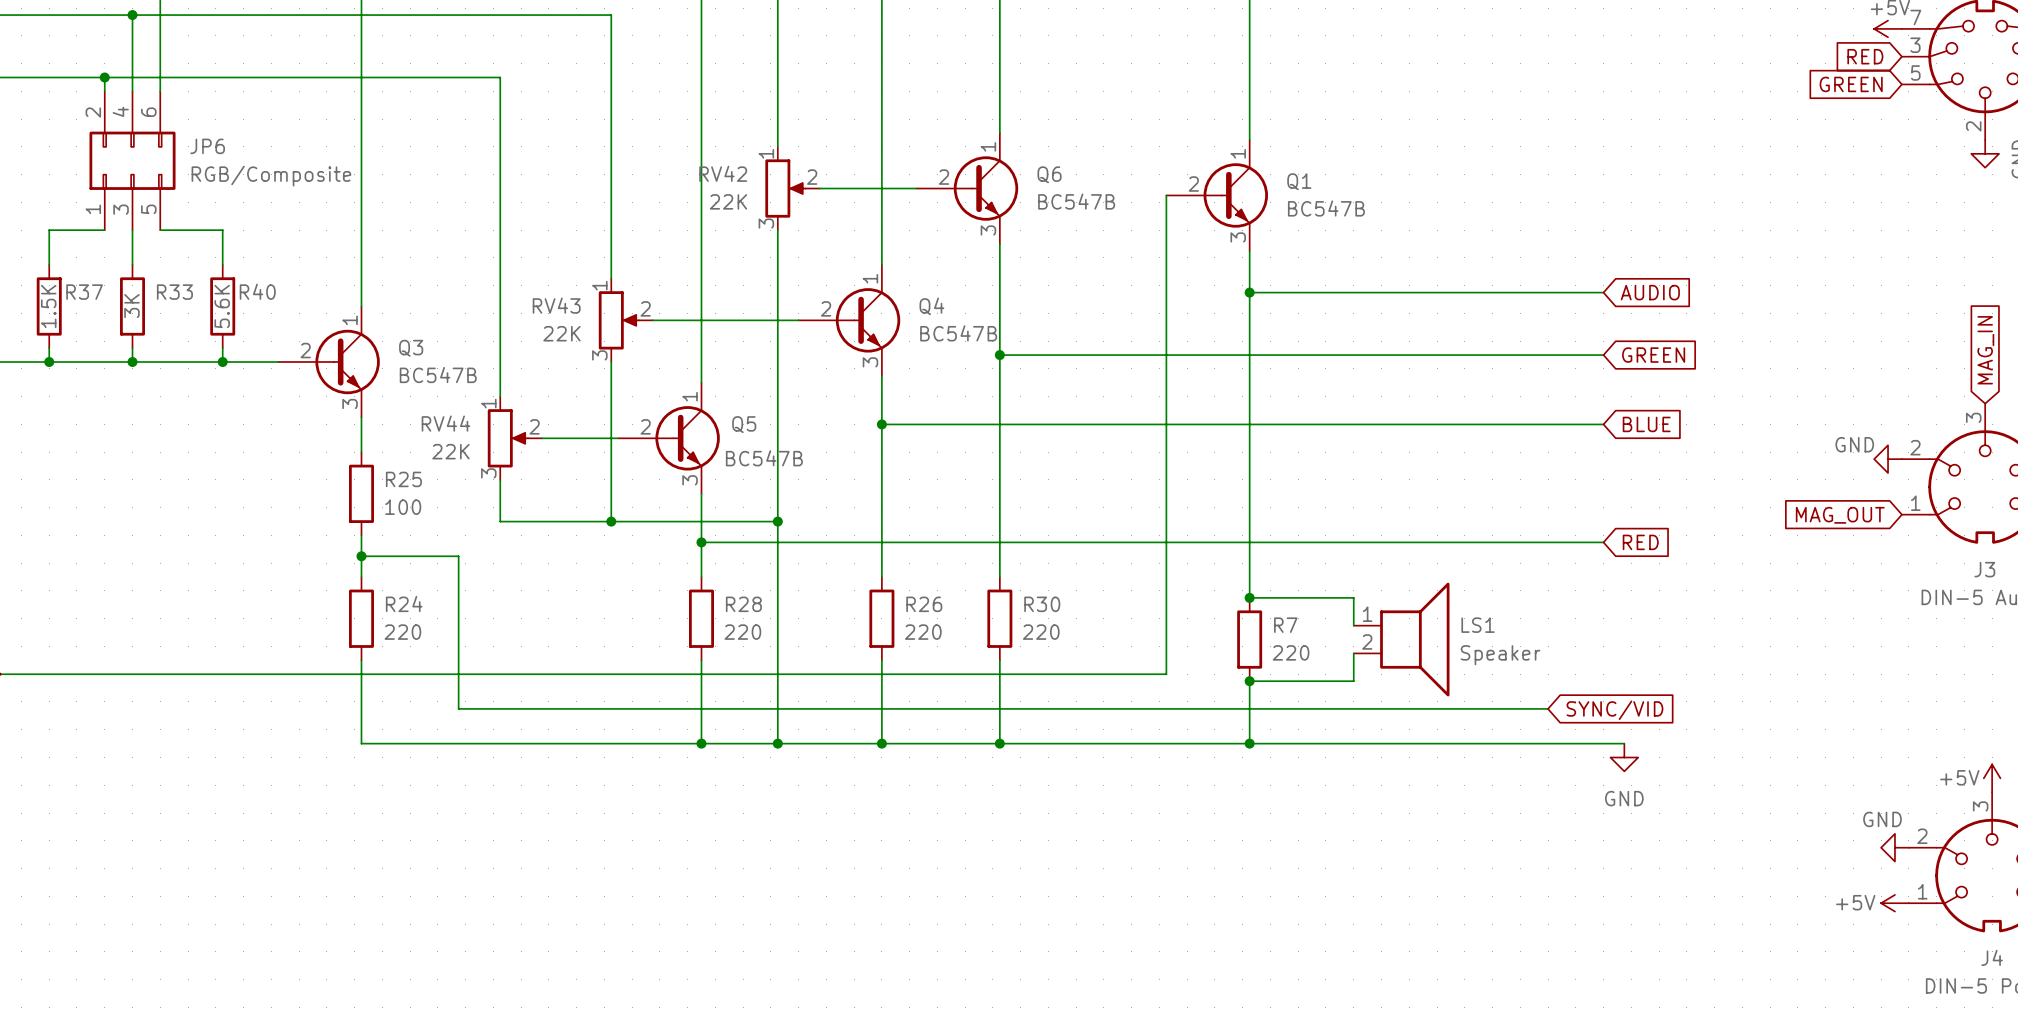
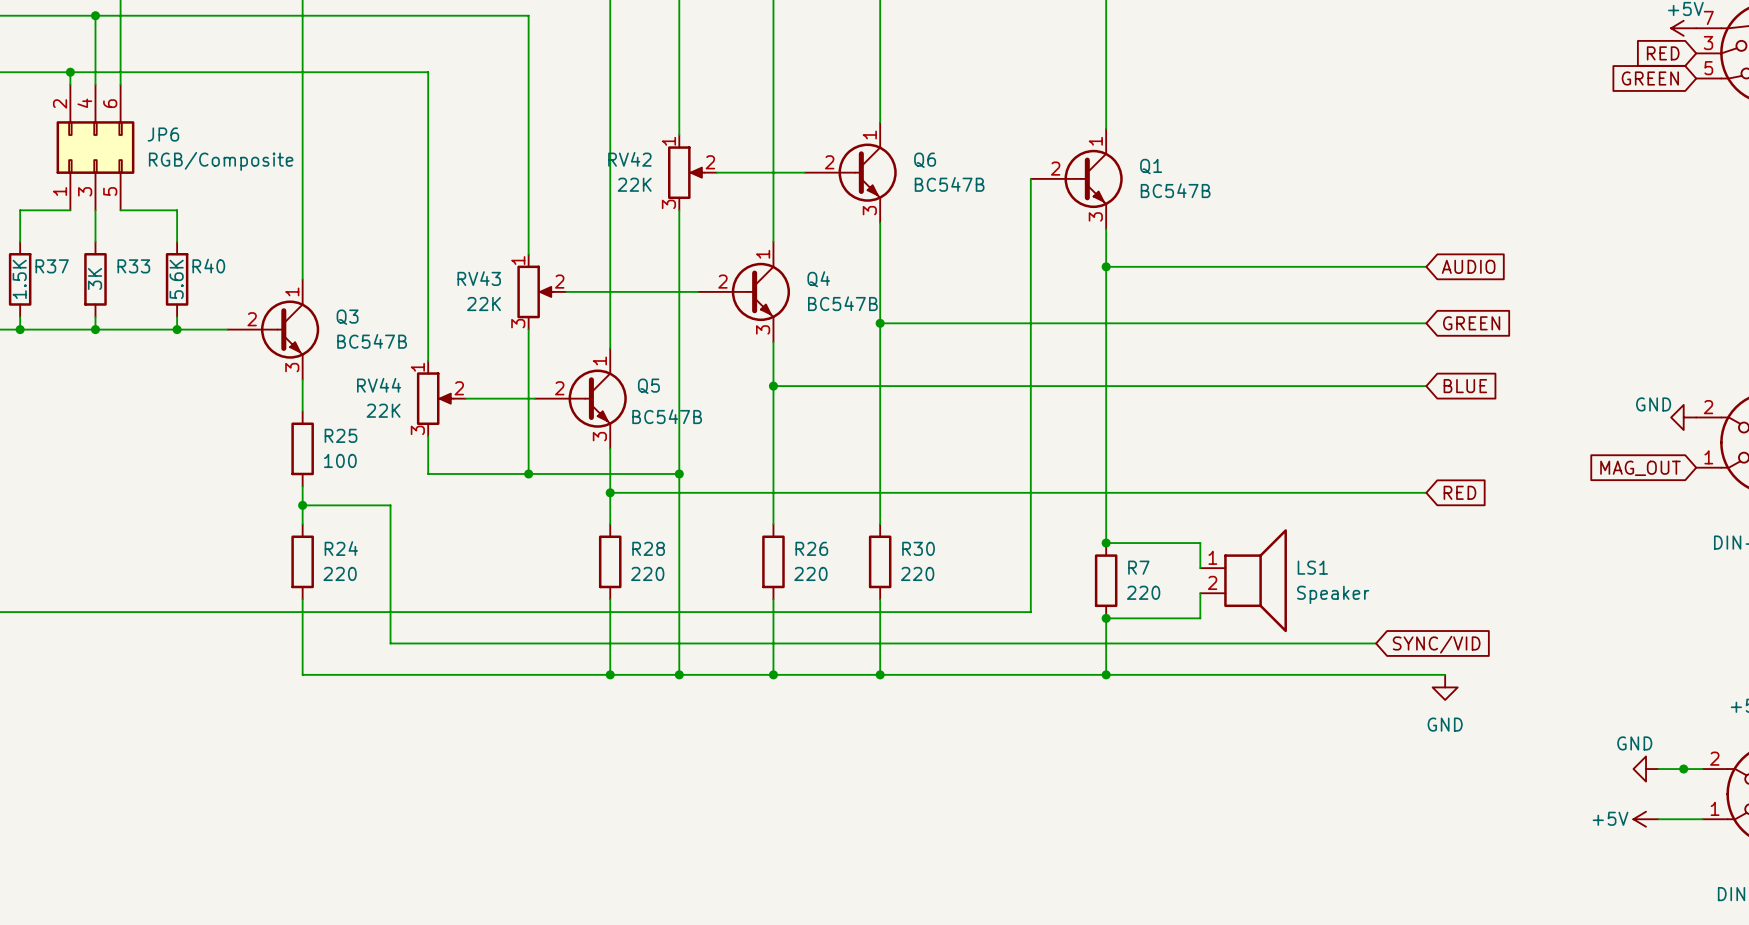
wire: none -> (1658, 769) (1702, 769)
junction: none -> (1683, 769)
power symbol position: GND (1894, 847) -> GND (1646, 769)
power symbol position: +5V (1894, 903) -> +5V (1646, 819)

